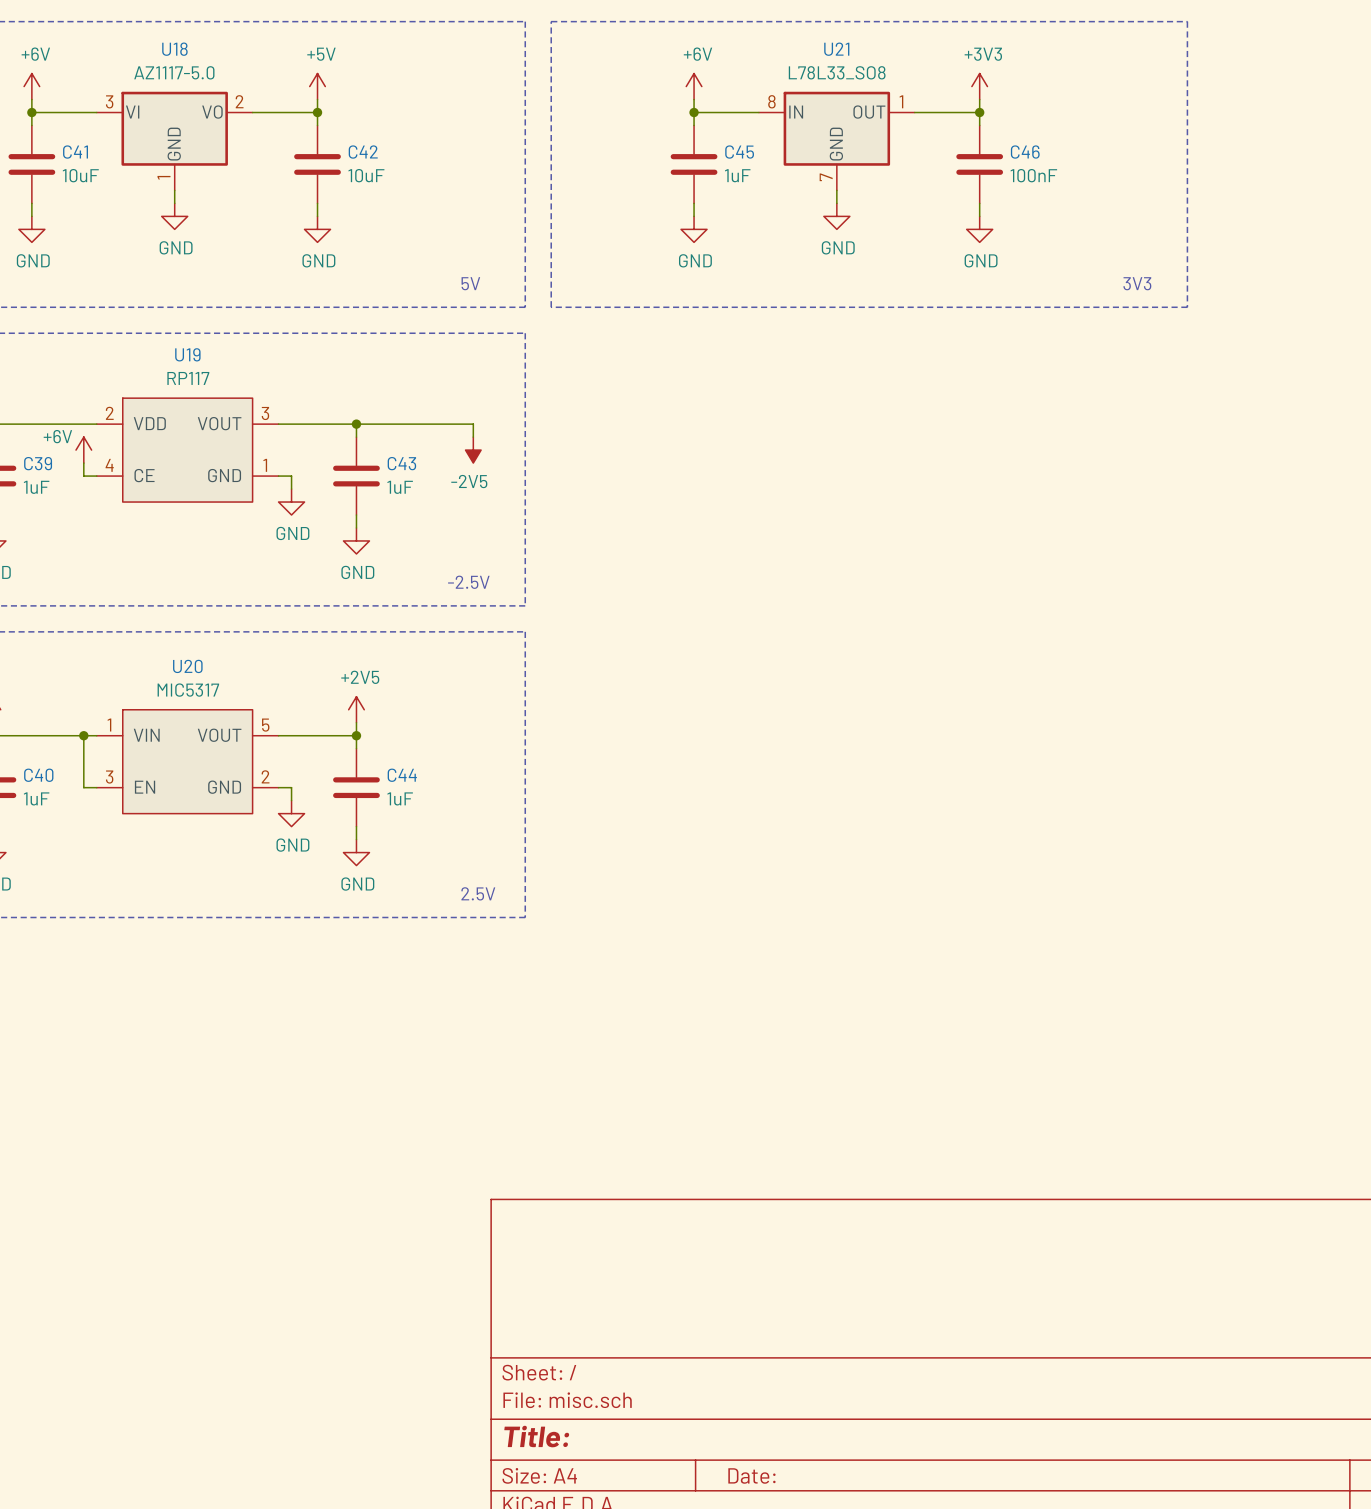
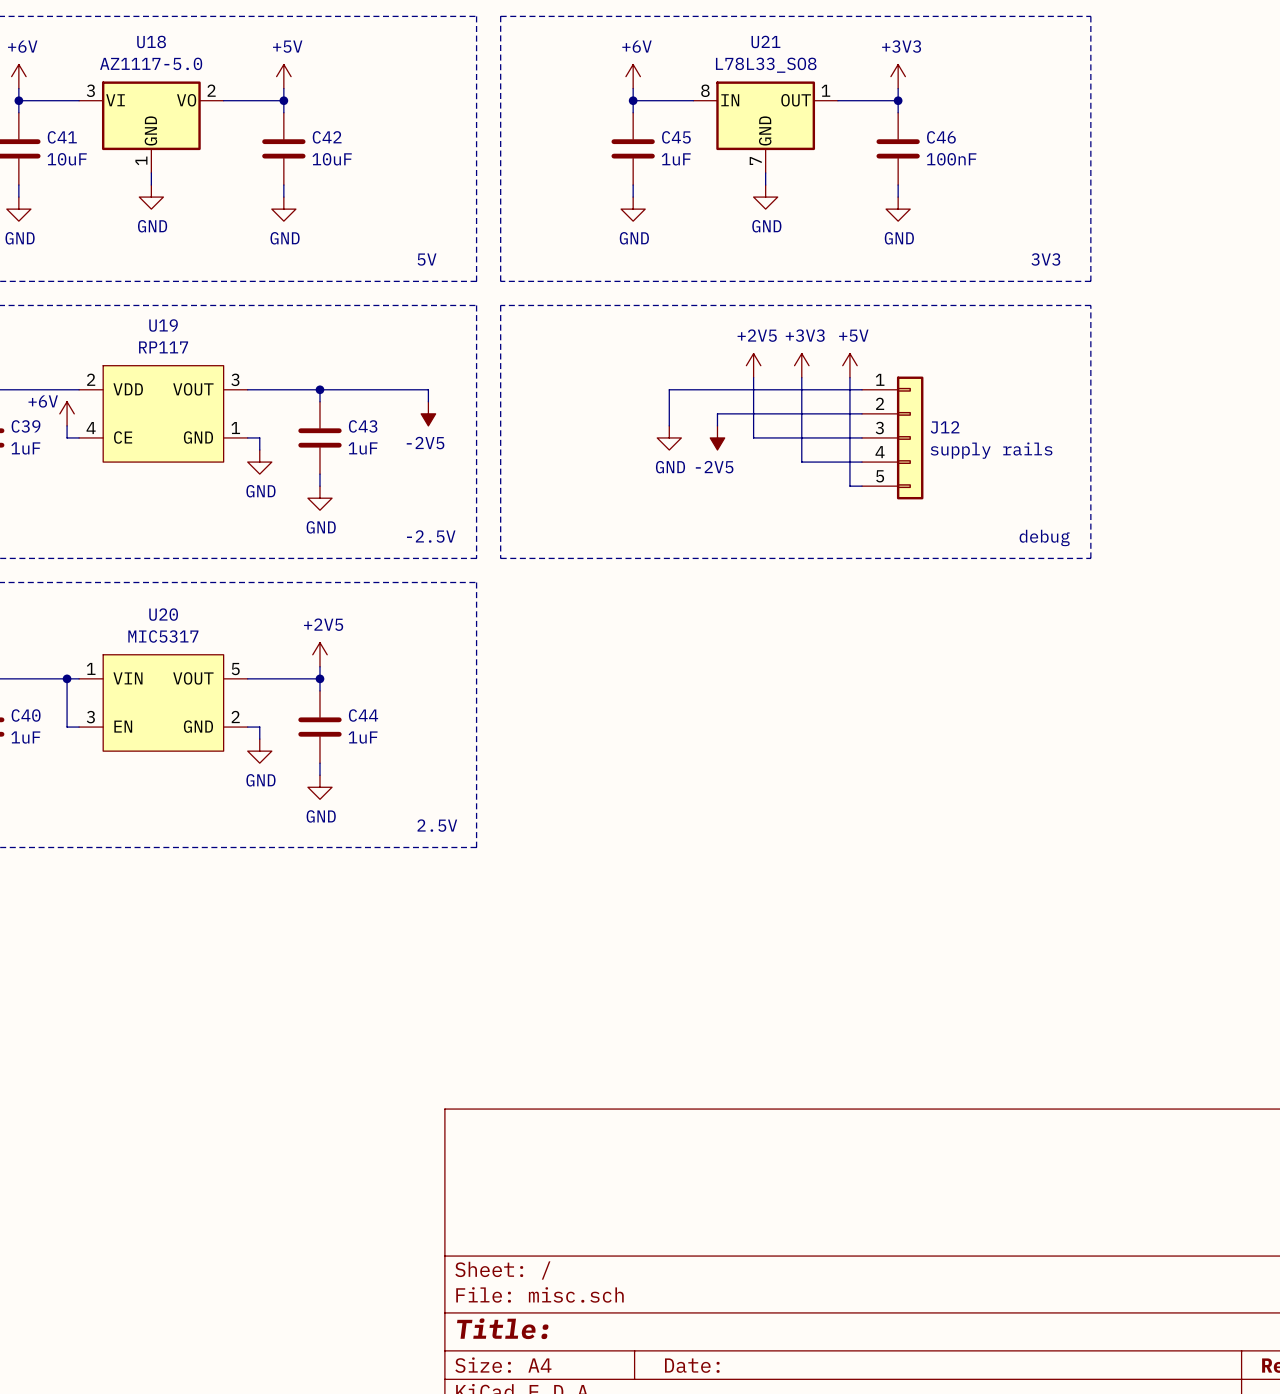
line: none -> (500, 305) (500, 558) (1090, 558) (1090, 305) (500, 305)
power symbol: none -> +2V5 (753, 365)
power symbol: none -> +3V3 (801, 365)
power symbol: none -> +5V (849, 365)
wire: none -> (753, 377) (753, 437) (862, 437)
wire: none -> (801, 377) (801, 462) (862, 462)
wire: none -> (849, 377) (849, 486) (862, 486)
wire: none -> (862, 389) (669, 389) (669, 425)
wire: none -> (862, 413) (717, 413) (717, 425)
power symbol: none -> GND (669, 437)
power symbol: none -> -2V5 (717, 437)
J12: none -> supply rails (892, 437)
text: none -> debug (1044, 537)

